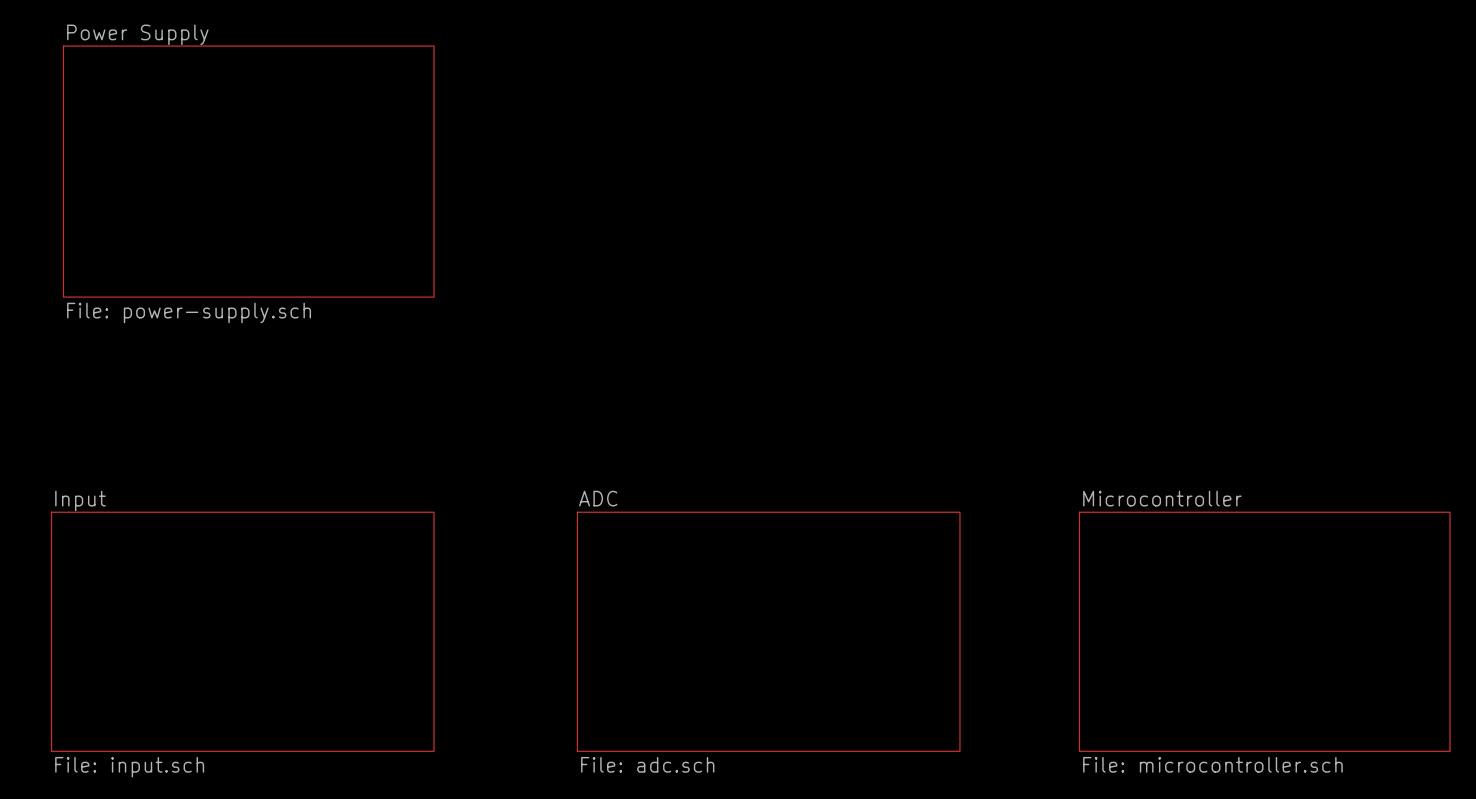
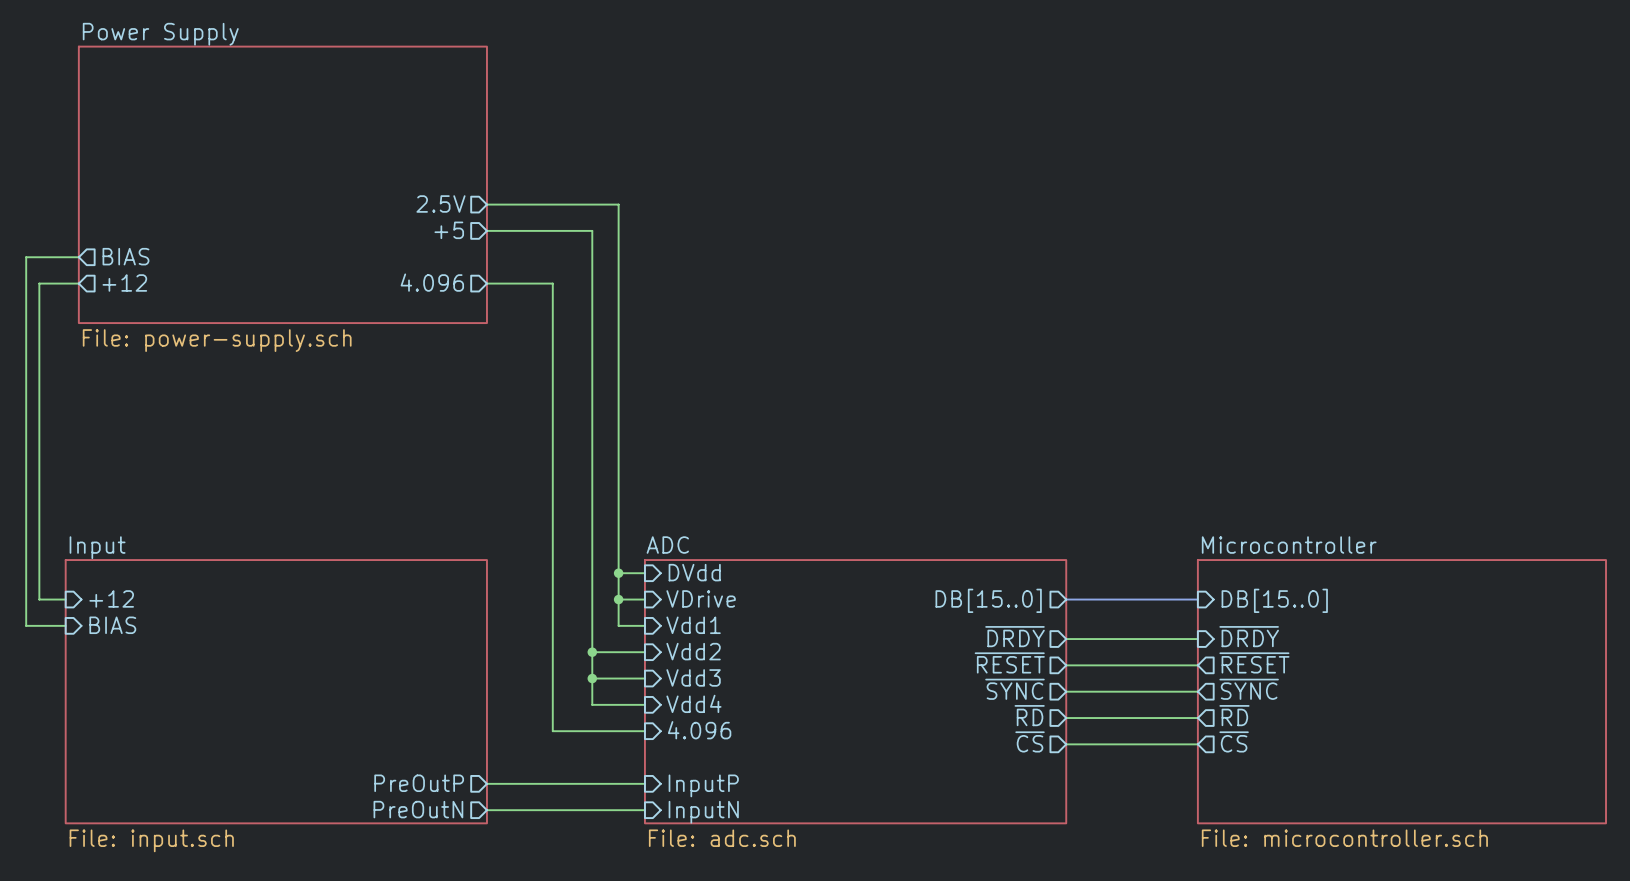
sheet pin: none -> 2.5V (440, 203)
wire: none -> (486, 204) (618, 204) (618, 625) (644, 625)
sheet pin: none -> +5 (449, 230)
wire: none -> (486, 230) (592, 230) (592, 704) (644, 704)
sheet pin: none -> BIAS (125, 256)
wire: none -> (78, 257) (26, 257) (26, 625) (65, 625)
sheet pin: none -> +12 (124, 282)
sheet pin: none -> 4.096 (432, 282)
wire: none -> (78, 283) (39, 283) (39, 599) (65, 599)
wire: none -> (486, 283) (552, 283) (552, 731) (644, 731)
sheet pin: none -> DVdd (694, 572)
wire: none -> (618, 573) (644, 573)
junction: none -> (618, 573)
sheet pin: none -> +12 (111, 598)
sheet pin: none -> VDrive (701, 598)
wire: none -> (618, 599) (644, 599)
junction: none -> (618, 599)
bus: none -> (1066, 599) (1197, 599)
sheet pin: none -> DB[15..0] (988, 600)
sheet pin: none -> DB[15..0] (1274, 600)
sheet pin: none -> BIAS (112, 625)
sheet pin: none -> Vdd1 (693, 625)
sheet pin: none -> ~{DRDY} (1015, 636)
sheet pin: none -> ~{DRDY} (1249, 636)
wire: none -> (1066, 639) (1197, 639)
wire: none -> (592, 652) (644, 652)
junction: none -> (592, 652)
sheet pin: none -> Vdd2 (693, 651)
sheet pin: none -> ~{RESET} (1009, 662)
sheet pin: none -> ~{RESET} (1254, 662)
wire: none -> (1066, 665) (1197, 665)
wire: none -> (592, 678) (644, 678)
junction: none -> (592, 678)
sheet pin: none -> Vdd3 (693, 677)
sheet pin: none -> ~{SYNC} (1014, 689)
sheet pin: none -> ~{SYNC} (1249, 689)
wire: none -> (1066, 691) (1197, 691)
sheet pin: none -> Vdd4 (693, 703)
sheet pin: none -> ~{RD} (1029, 715)
sheet pin: none -> ~{RD} (1234, 715)
wire: none -> (1066, 718) (1197, 718)
sheet pin: none -> 4.096 (699, 730)
sheet pin: none -> ~{CS} (1030, 741)
sheet pin: none -> ~{CS} (1234, 741)
wire: none -> (1066, 744) (1197, 744)
sheet pin: none -> PreOutP (419, 783)
wire: none -> (486, 783) (644, 783)
sheet pin: none -> InputP (703, 785)
sheet pin: none -> PreOutN (418, 809)
wire: none -> (486, 810) (644, 810)
sheet pin: none -> InputN (703, 812)

